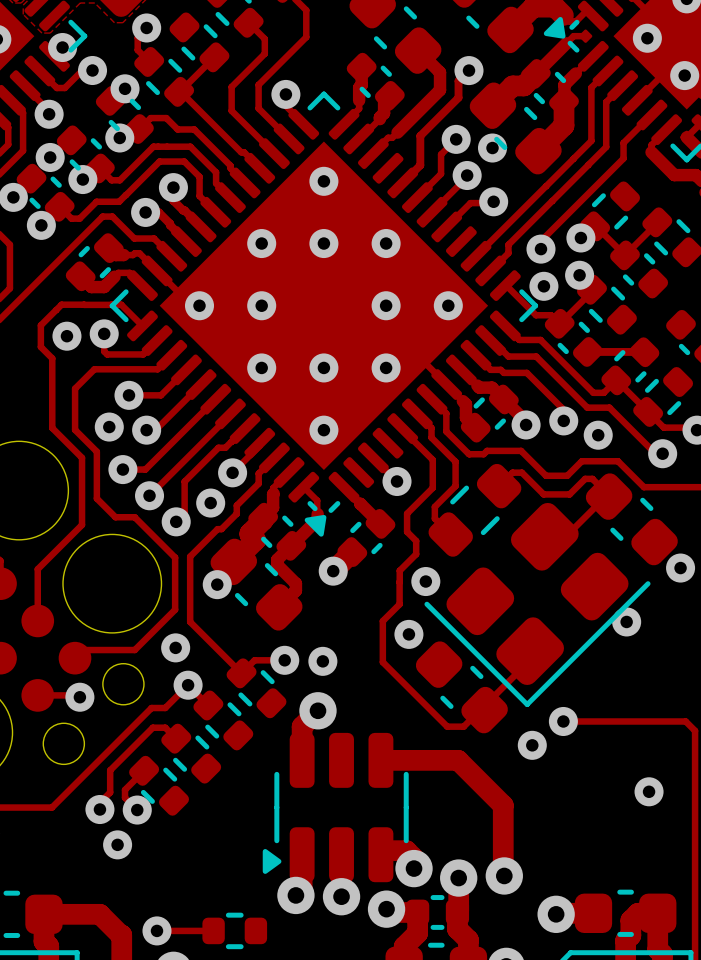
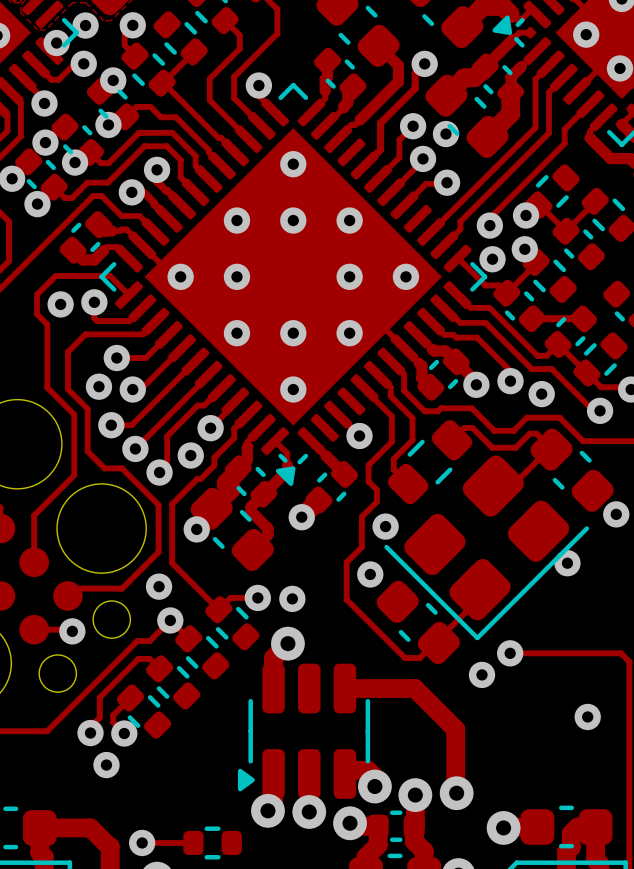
via: none -> (85, 25)

